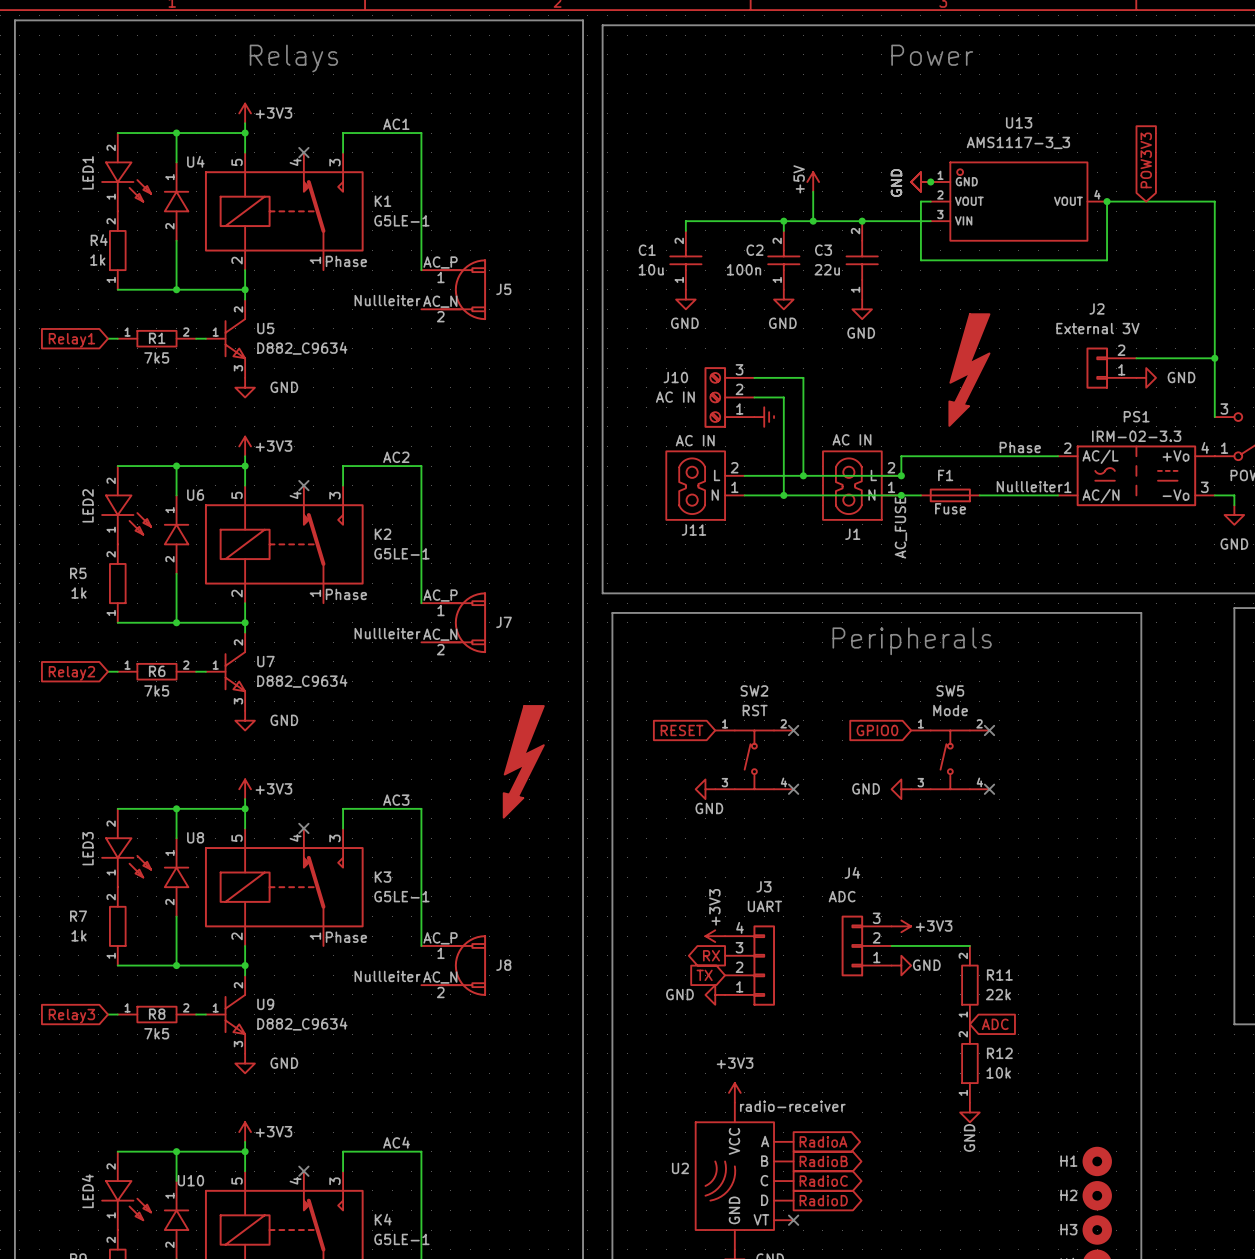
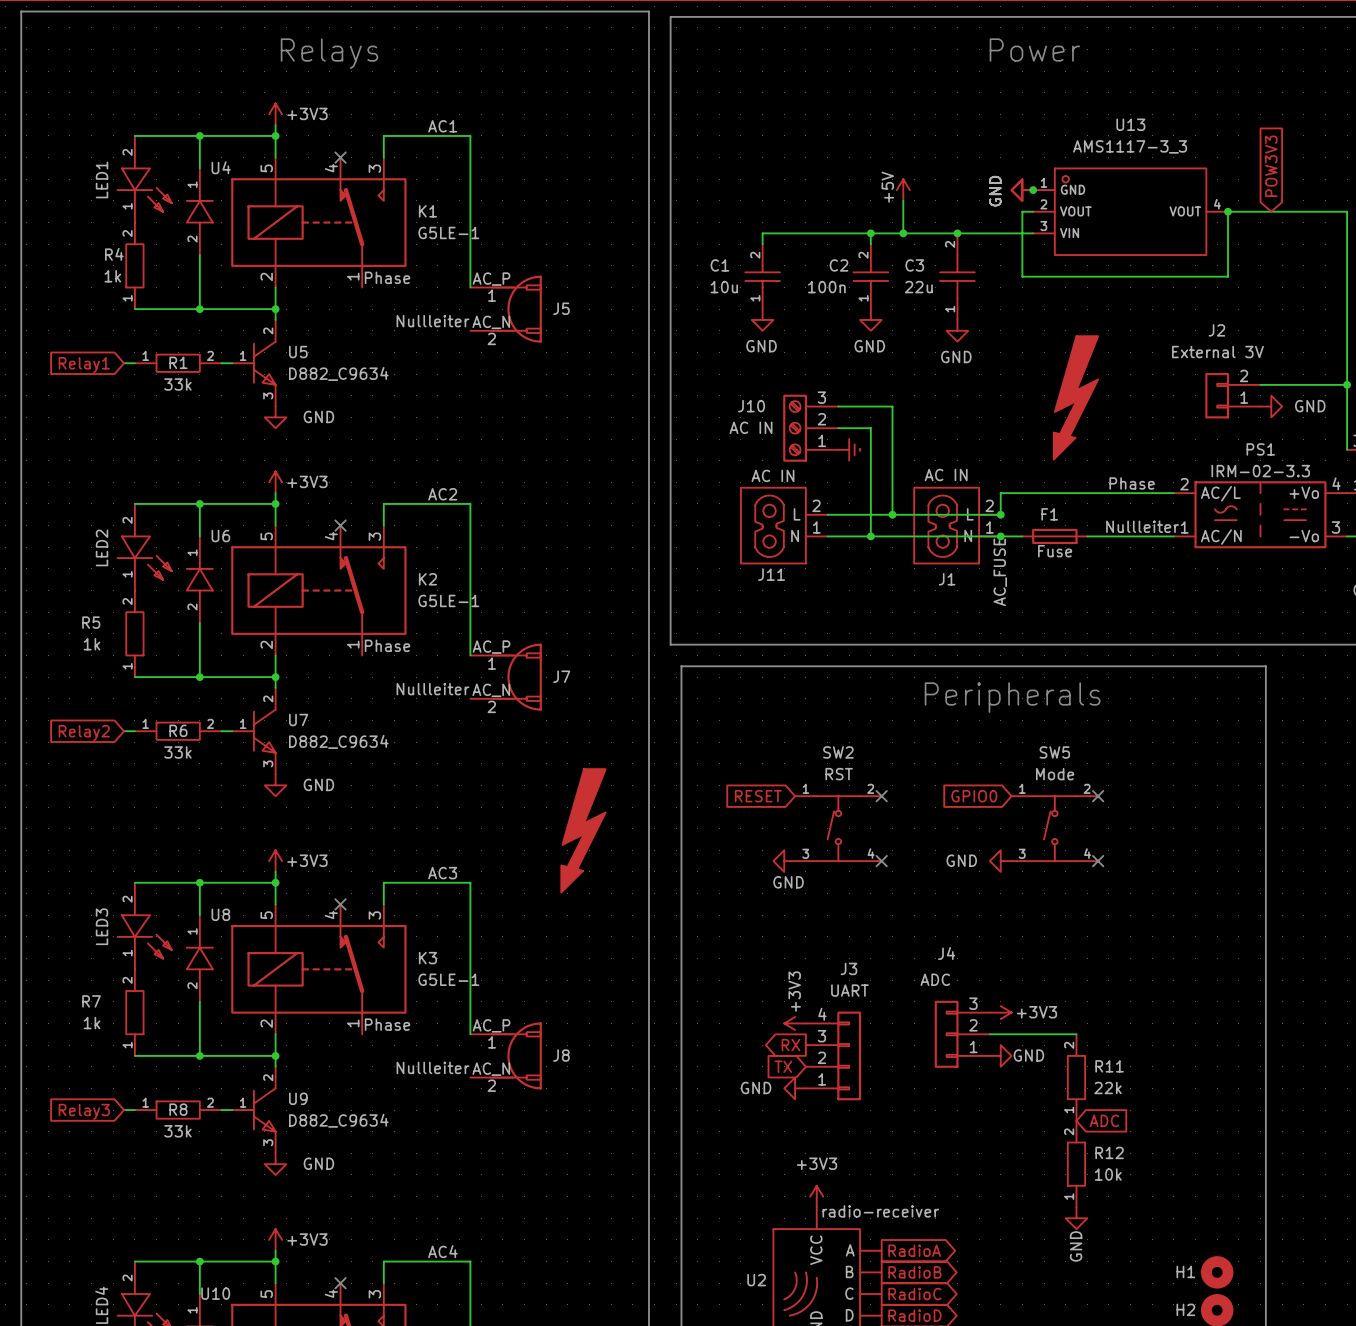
R1 value: 7k5 (156, 357) -> 33k (177, 384)
R6 value: 7k5 (156, 690) -> 33k (177, 752)
R8 value: 7k5 (156, 1033) -> 33k (177, 1131)

